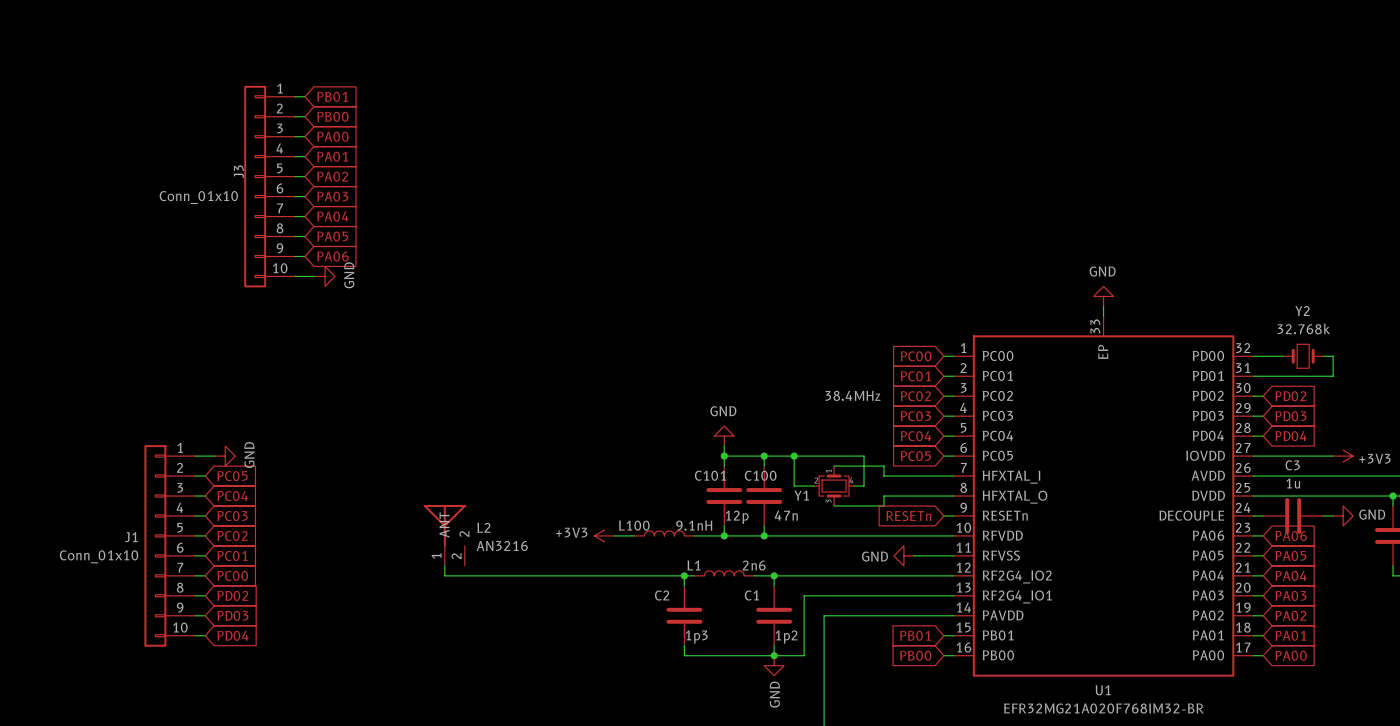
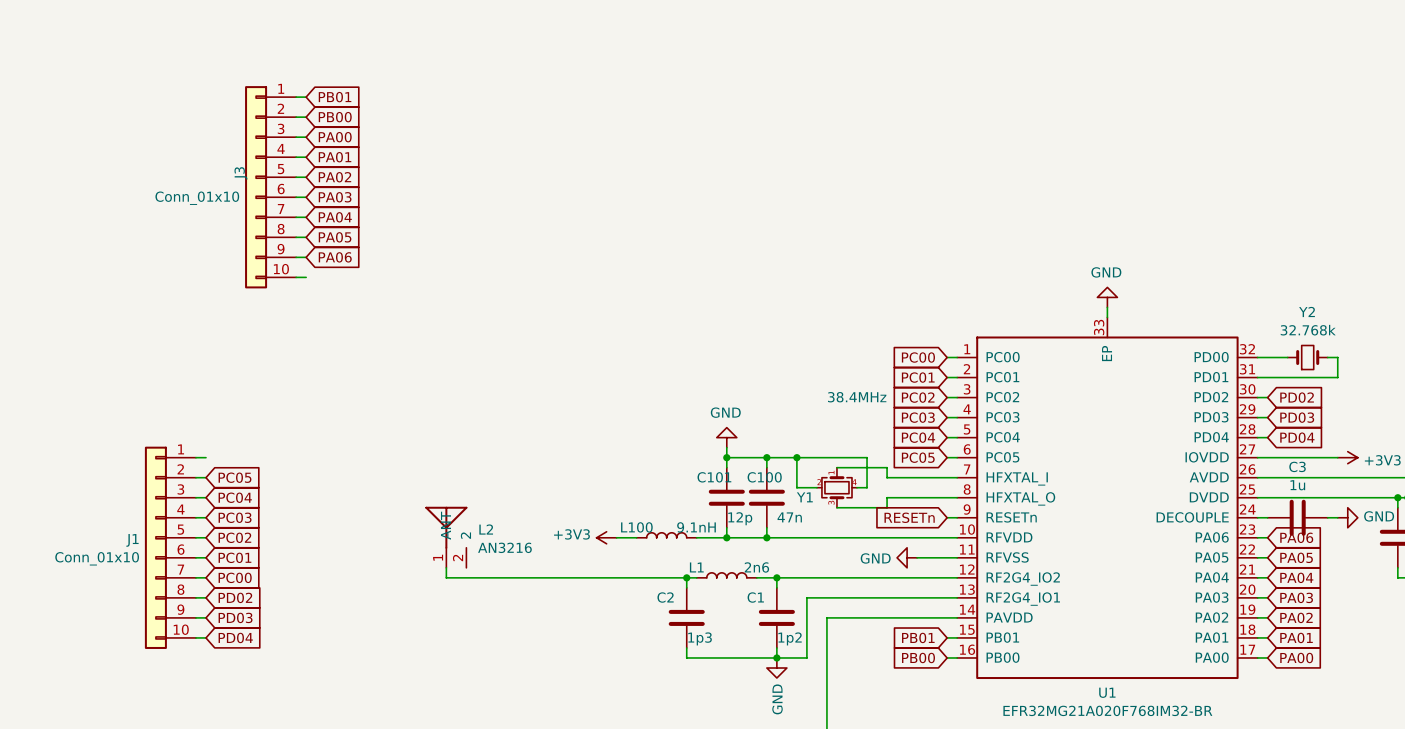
wire: (305, 276) (315, 276) -> none
power symbol: GND (325, 276) -> none
wire: (205, 456) (215, 456) -> none
power symbol: GND (225, 456) -> none

